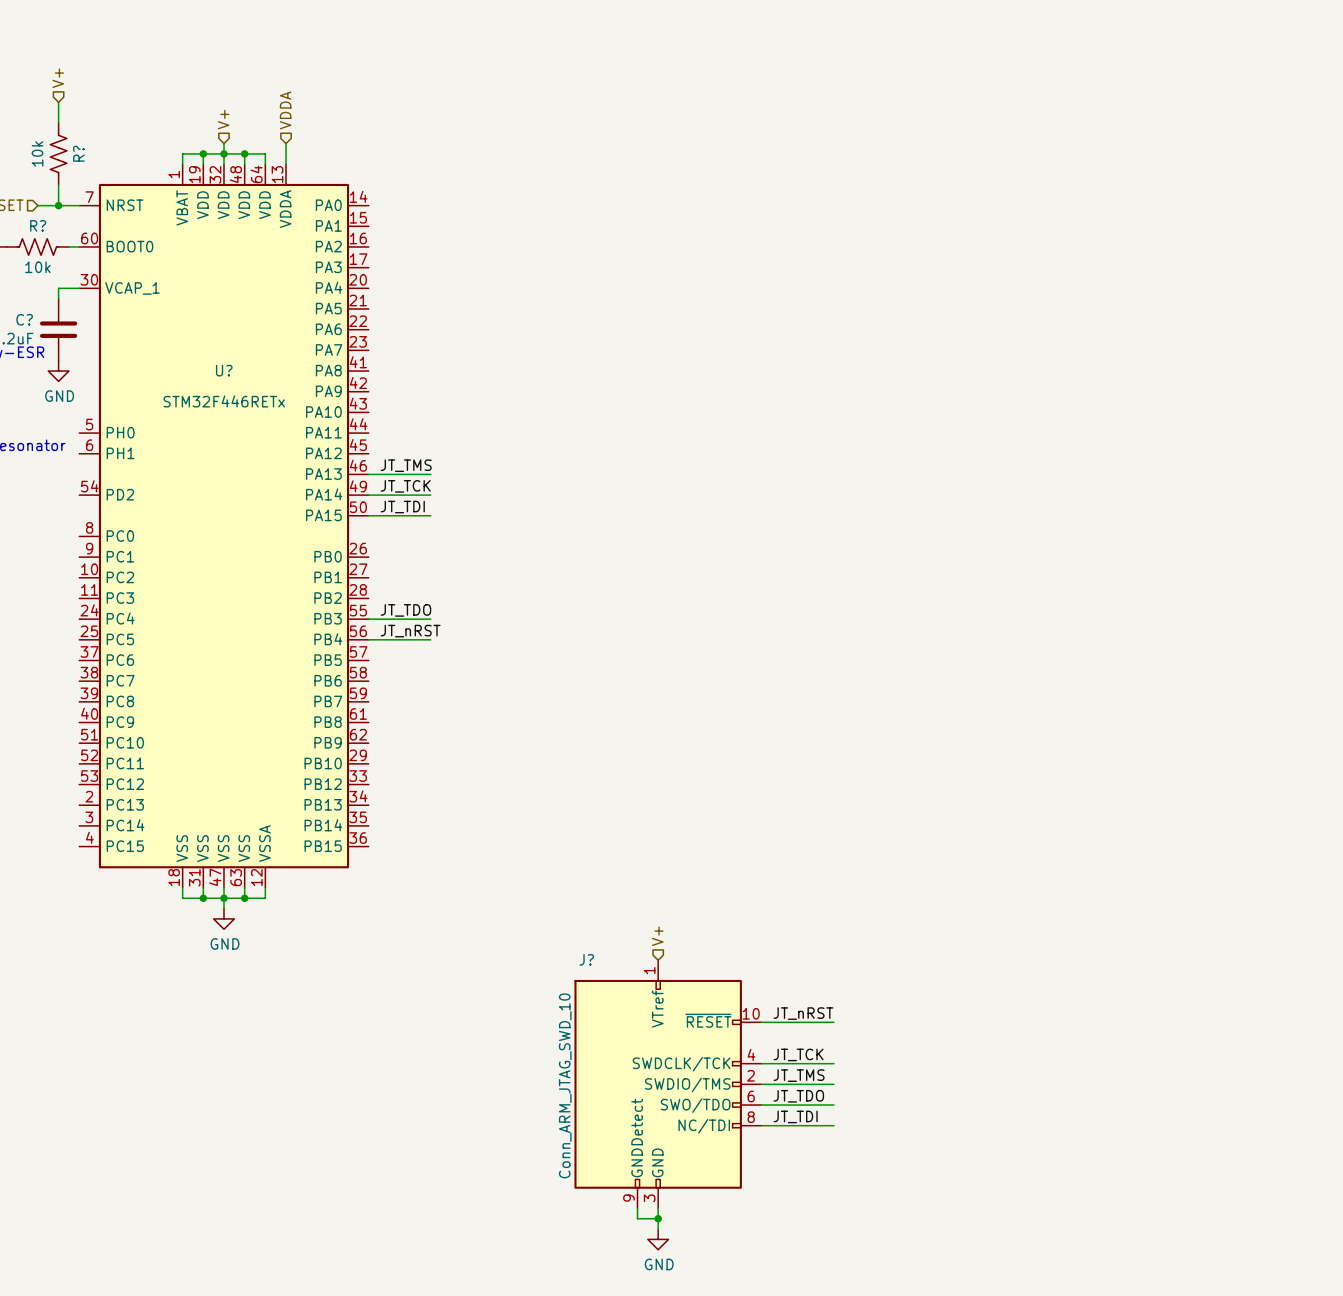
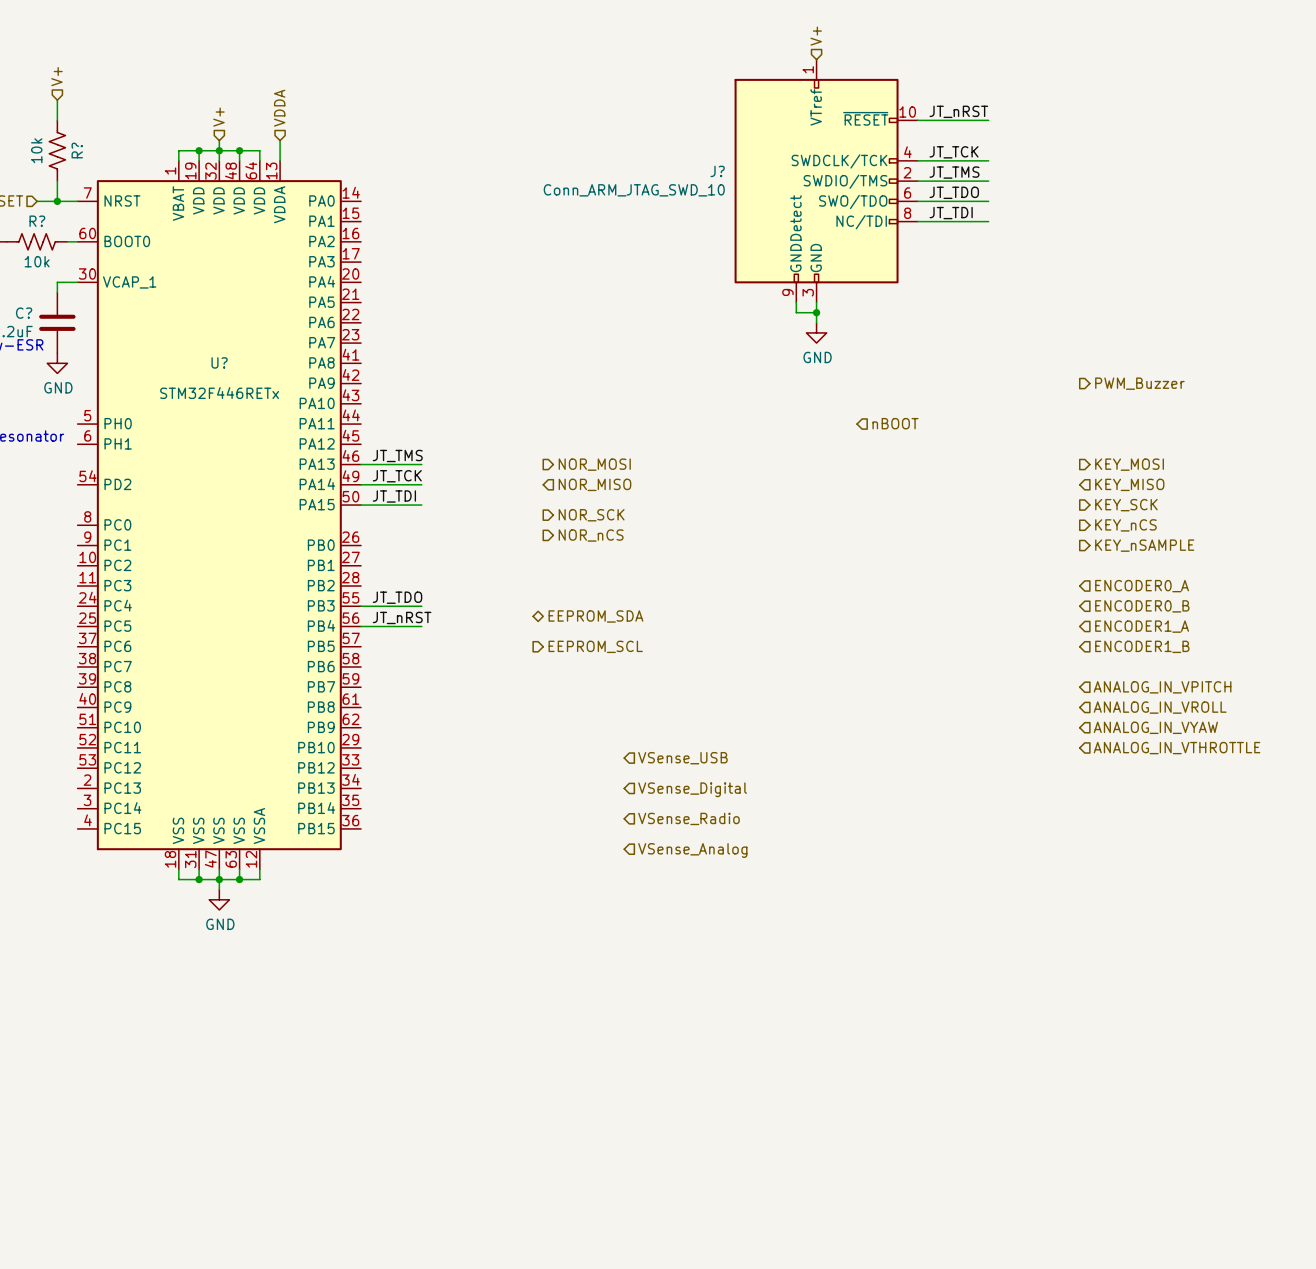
hierarchical label: none -> V+ (816, 36)
label: none -> JT_nRST (958, 111)
wire: none -> (917, 120) (988, 120)
label: none -> JT_TCK (954, 152)
wire: none -> (917, 160) (988, 160)
label: none -> JT_TMS (954, 172)
J?: none -> Conn_ARM_JTAG_SWD_10 (826, 181)
wire: none -> (917, 181) (988, 181)
label: none -> JT_TDO (954, 192)
wire: none -> (917, 201) (988, 201)
label: none -> JT_TDI (951, 213)
wire: none -> (917, 221) (988, 221)
wire: none -> (796, 302) (796, 312) (816, 312)
wire: none -> (816, 302) (816, 322)
junction: none -> (816, 312)
power symbol: none -> GND (816, 332)
hierarchical label: none -> PWM_Buzzer (1139, 383)
hierarchical label: none -> nBOOT (895, 423)
hierarchical label: none -> NOR_MOSI (594, 464)
hierarchical label: none -> KEY_MOSI (1129, 464)
hierarchical label: none -> NOR_MISO (594, 484)
hierarchical label: none -> KEY_MISO (1129, 484)
hierarchical label: none -> KEY_SCK (1126, 505)
hierarchical label: none -> NOR_SCK (591, 515)
hierarchical label: none -> KEY_nCS (1125, 525)
hierarchical label: none -> NOR_nCS (591, 535)
hierarchical label: none -> KEY_nSAMPLE (1144, 545)
hierarchical label: none -> ENCODER0_A (1142, 586)
hierarchical label: none -> ENCODER0_B (1142, 606)
hierarchical label: none -> EEPROM_SDA (595, 616)
hierarchical label: none -> ENCODER1_A (1142, 626)
hierarchical label: none -> EEPROM_SCL (595, 646)
hierarchical label: none -> ENCODER1_B (1142, 646)
hierarchical label: none -> ANALOG_IN_VPITCH (1162, 687)
hierarchical label: none -> ANALOG_IN_VROLL (1160, 707)
hierarchical label: none -> ANALOG_IN_VYAW (1155, 727)
hierarchical label: none -> ANALOG_IN_VTHROTTLE (1177, 748)
hierarchical label: none -> VSense_USB (682, 758)
hierarchical label: none -> VSense_Digital (692, 789)
hierarchical label: none -> VSense_Radio (688, 818)
hierarchical label: none -> VSense_Analog (692, 850)
hierarchical label: V+ (657, 936) -> none
label: JT_nRST (803, 1013) -> none
wire: (761, 1022) (833, 1022) -> none
label: JT_TCK (798, 1054) -> none
wire: (761, 1063) (833, 1063) -> none
label: JT_TMS (799, 1075) -> none
J?: Conn_ARM_JTAG_SWD_10 (668, 1084) -> none
wire: (761, 1084) (833, 1084) -> none
label: JT_TDO (798, 1096) -> none
wire: (761, 1105) (833, 1105) -> none
label: JT_TDI (795, 1116) -> none
wire: (761, 1125) (833, 1125) -> none
wire: (637, 1208) (637, 1218) (658, 1218) -> none
wire: (658, 1208) (658, 1229) -> none
junction: (658, 1218) -> none
power symbol: GND (658, 1239) -> none

